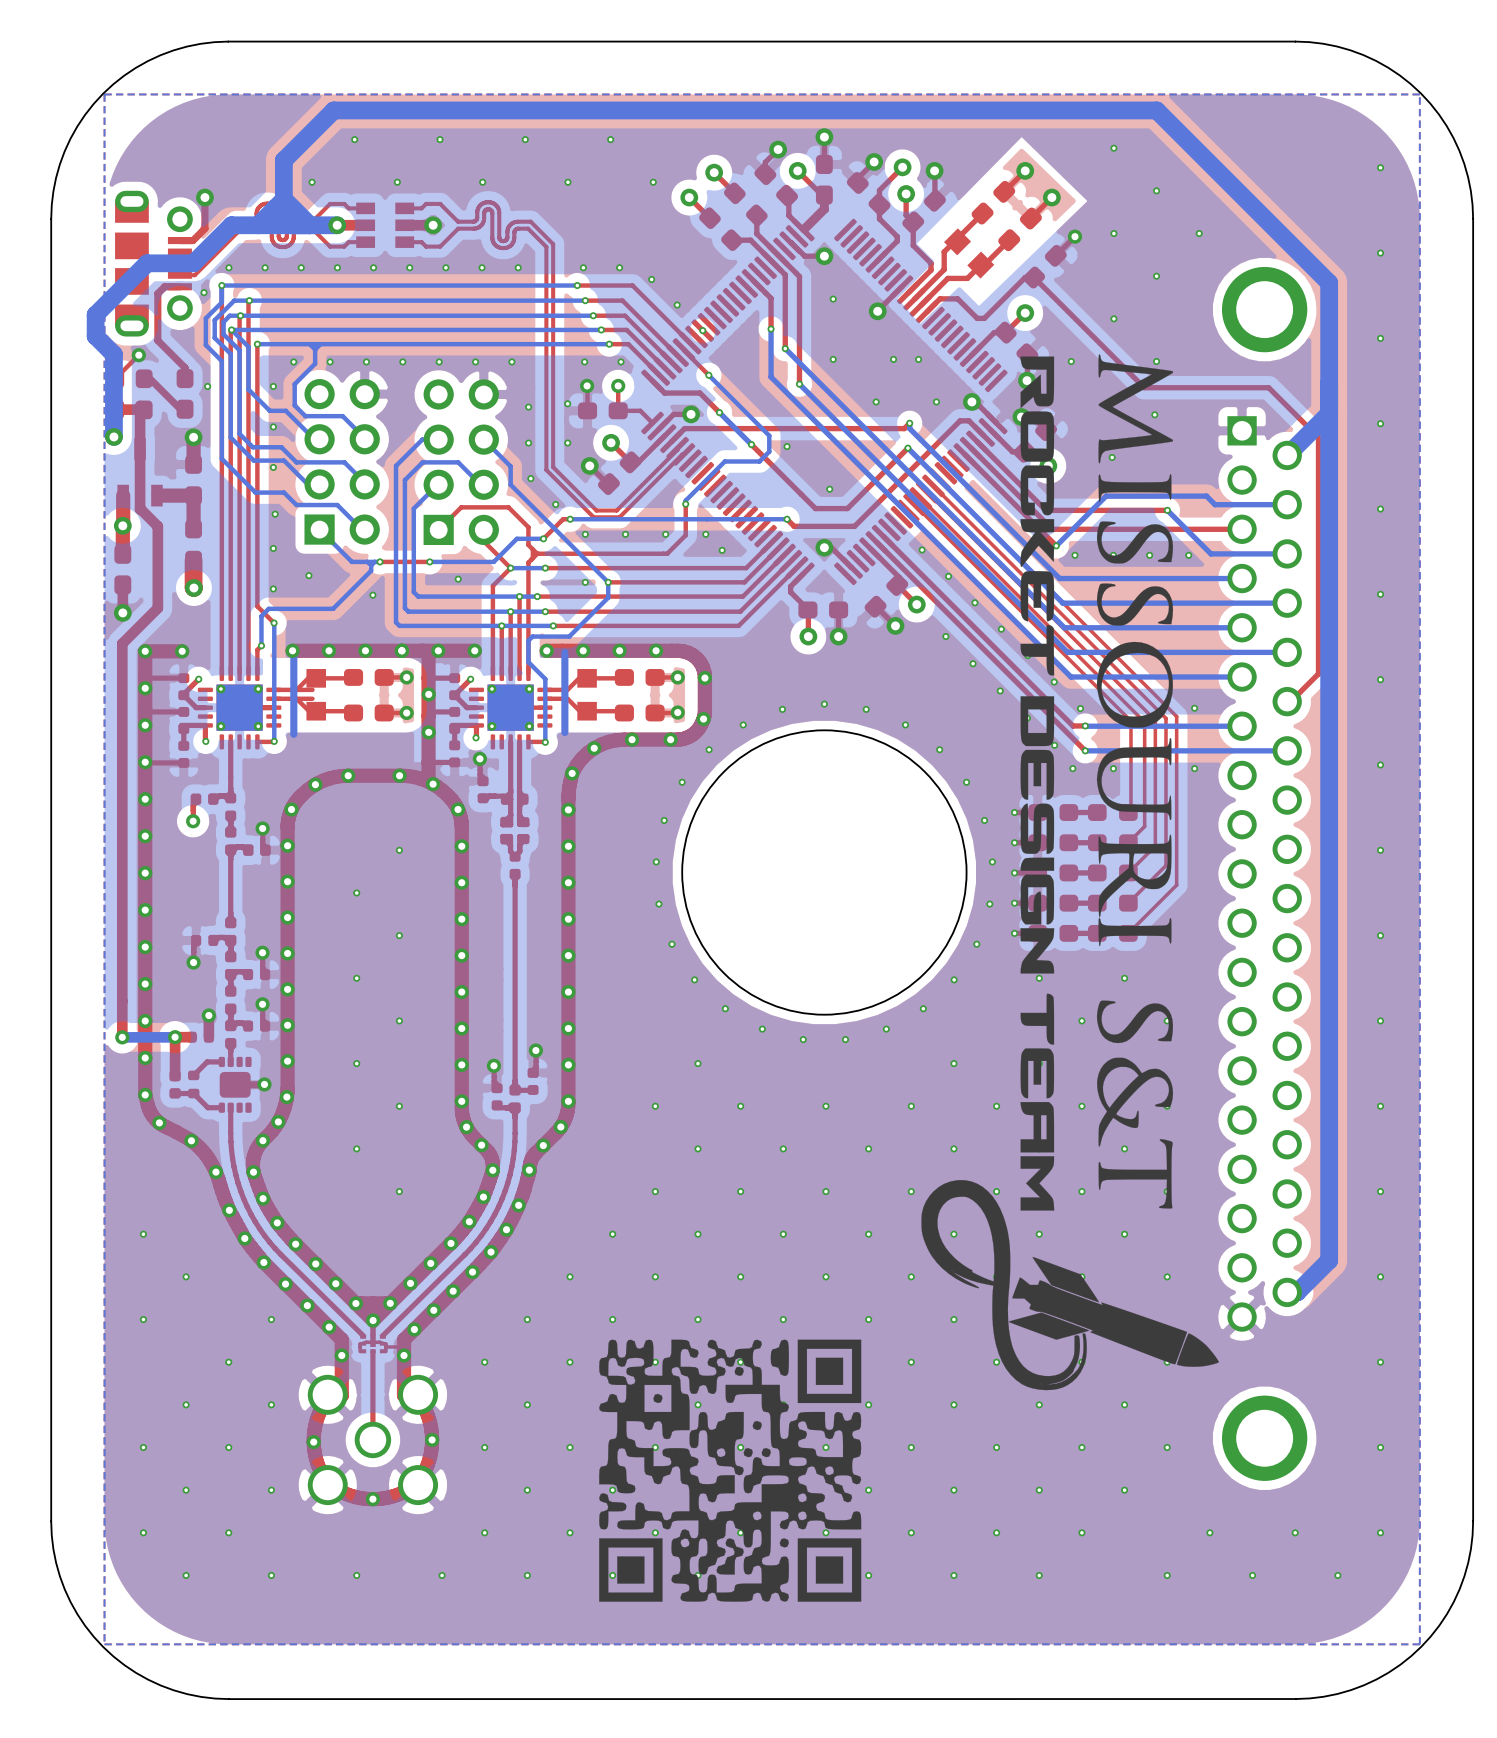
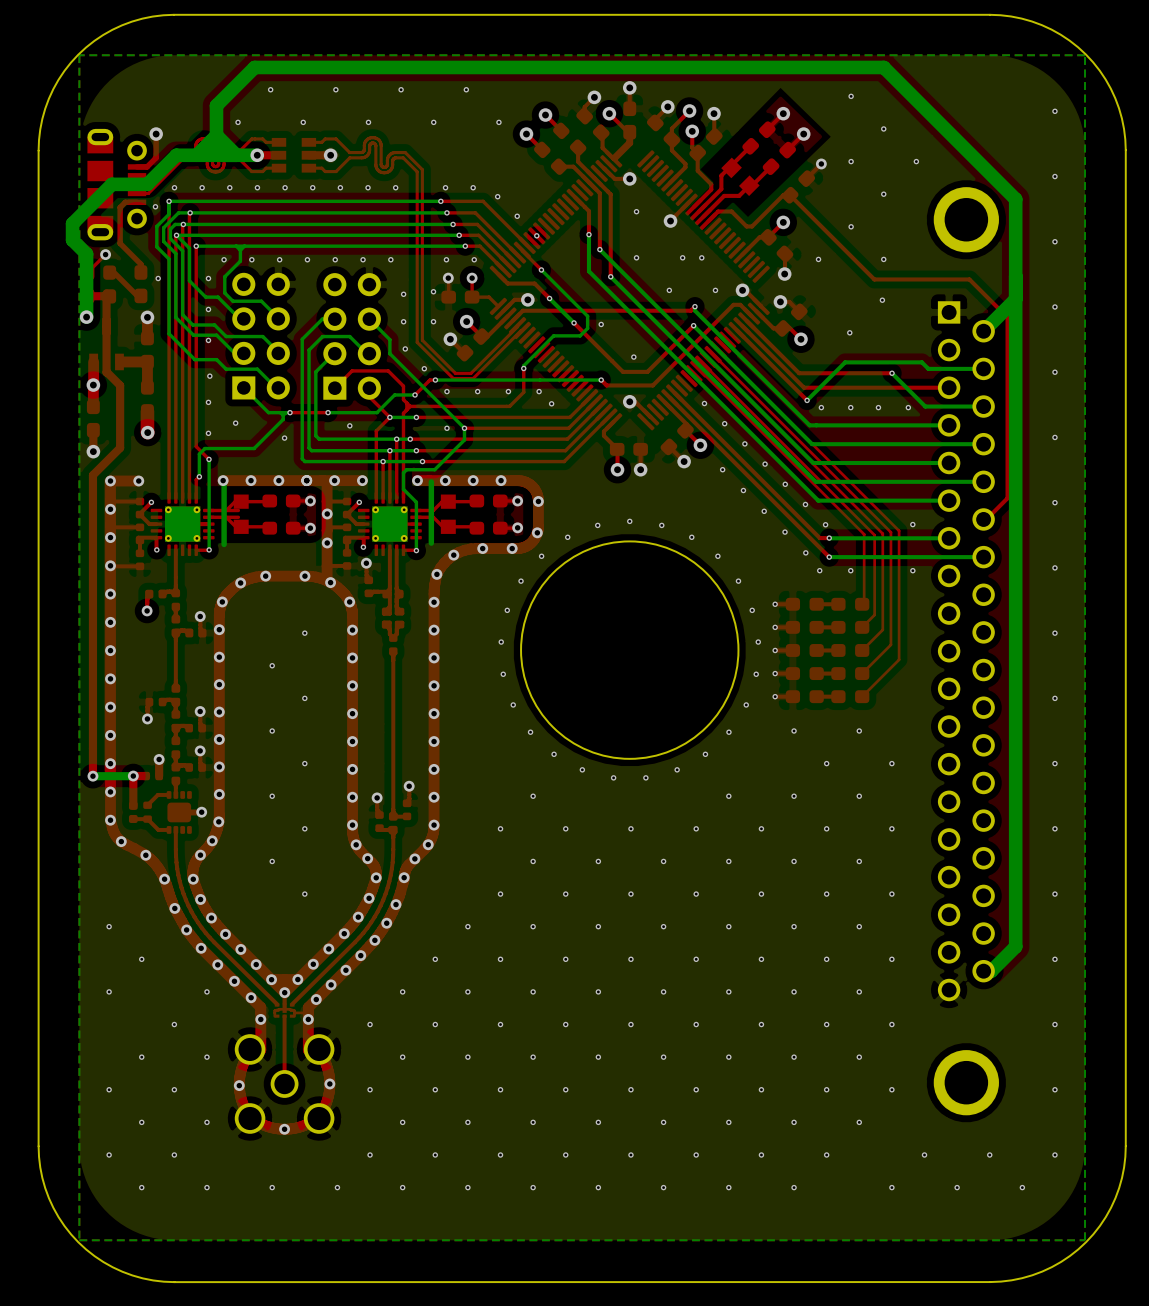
drawing: [921, 354, 1219, 1391] -> none
drawing: [599, 1339, 862, 1602] -> none

